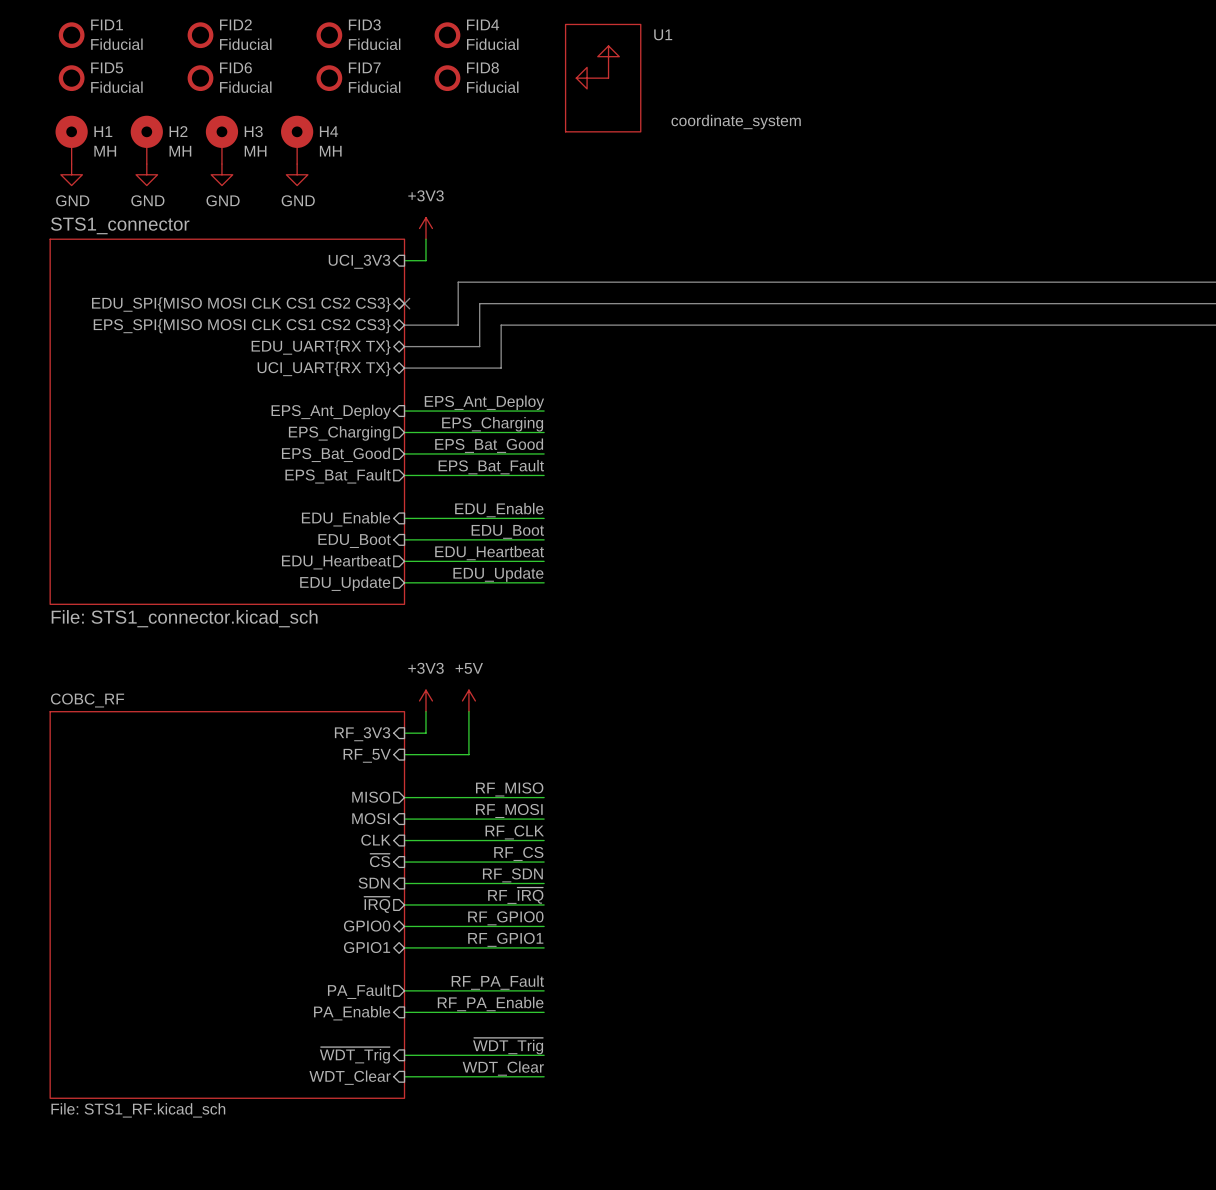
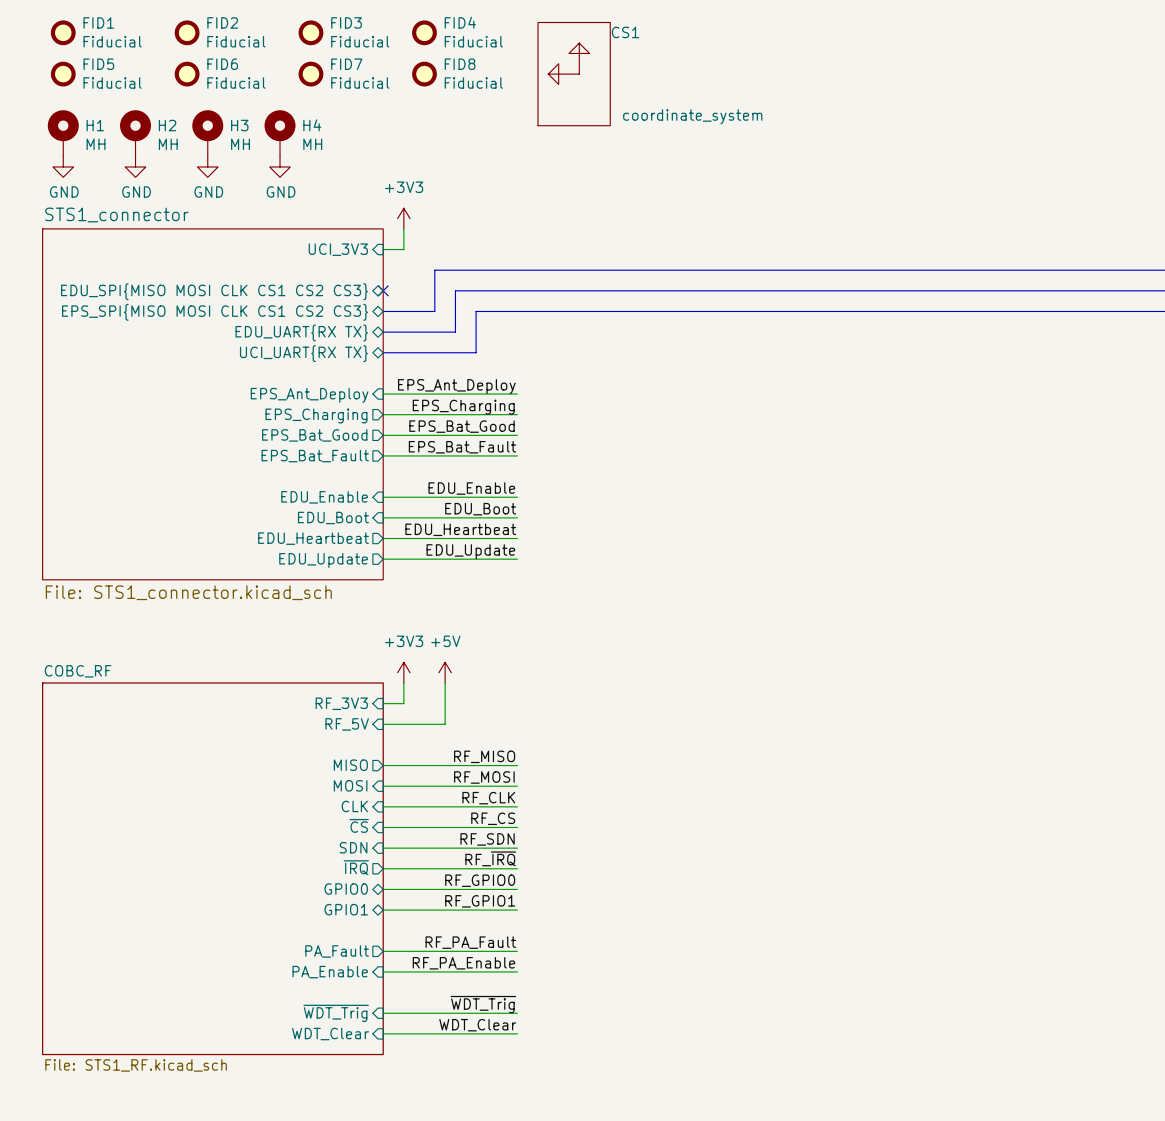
U1 name: U1 (663, 34) -> CS1 (625, 32)

